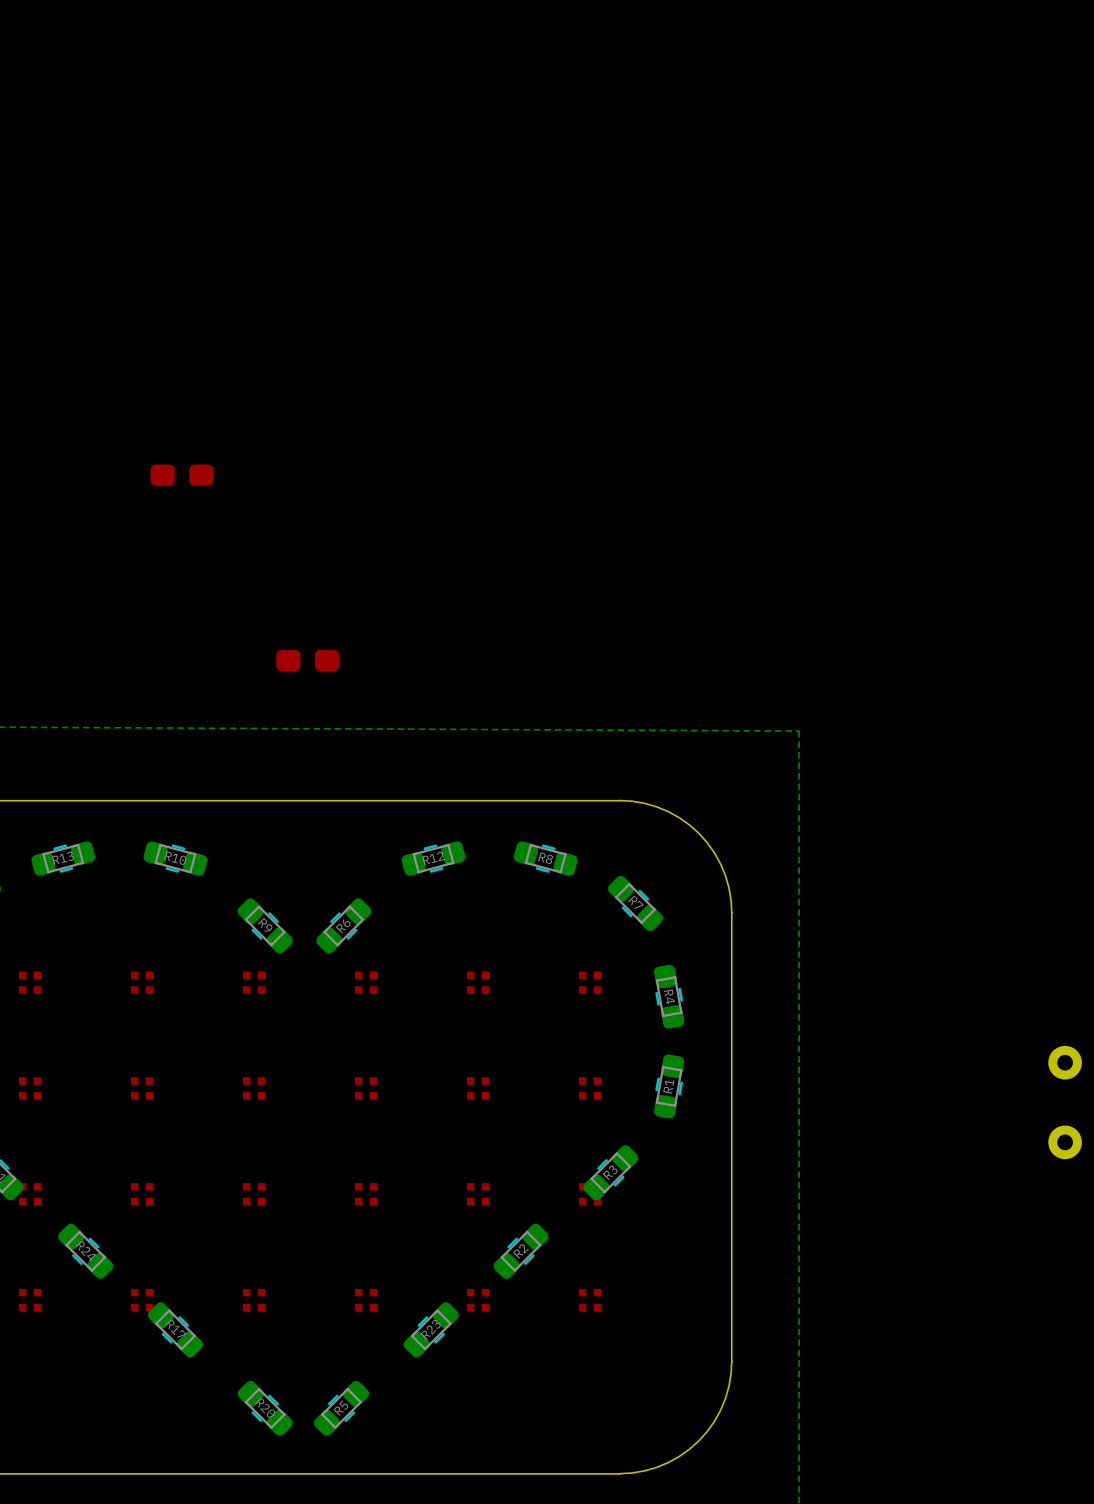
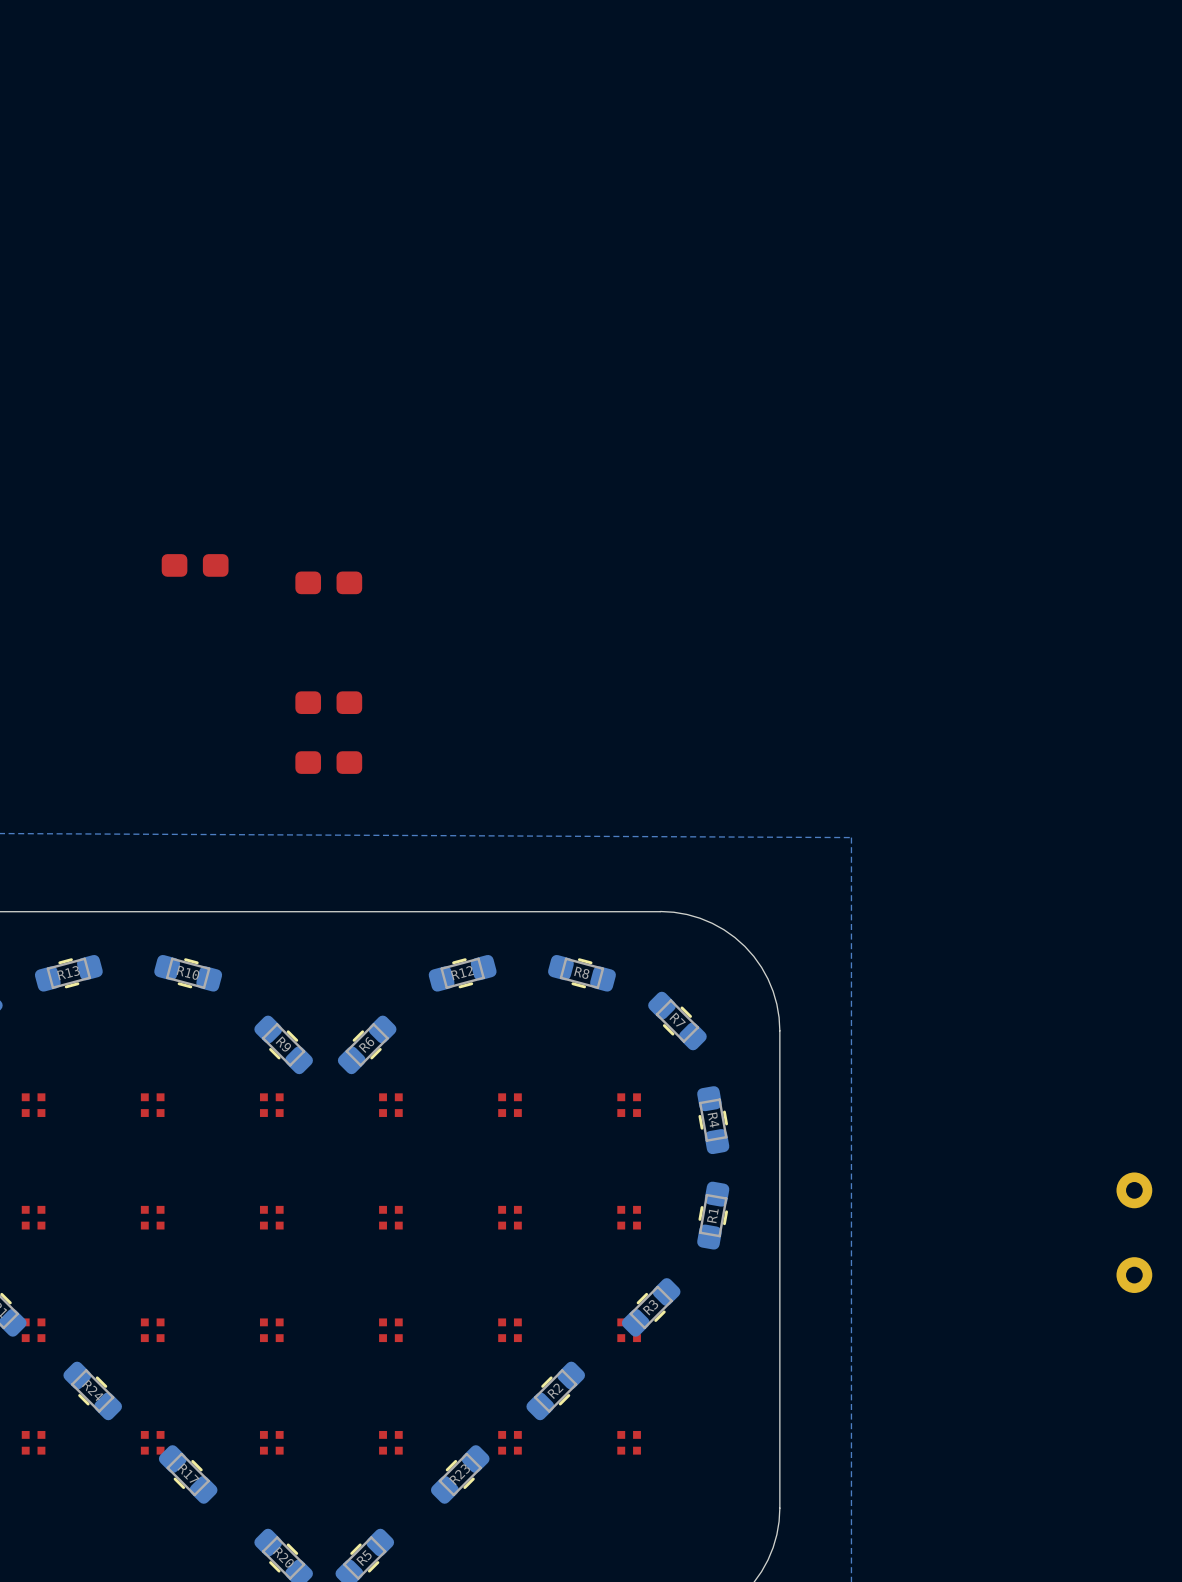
part: none -> (328, 582)
part: none -> (328, 702)

